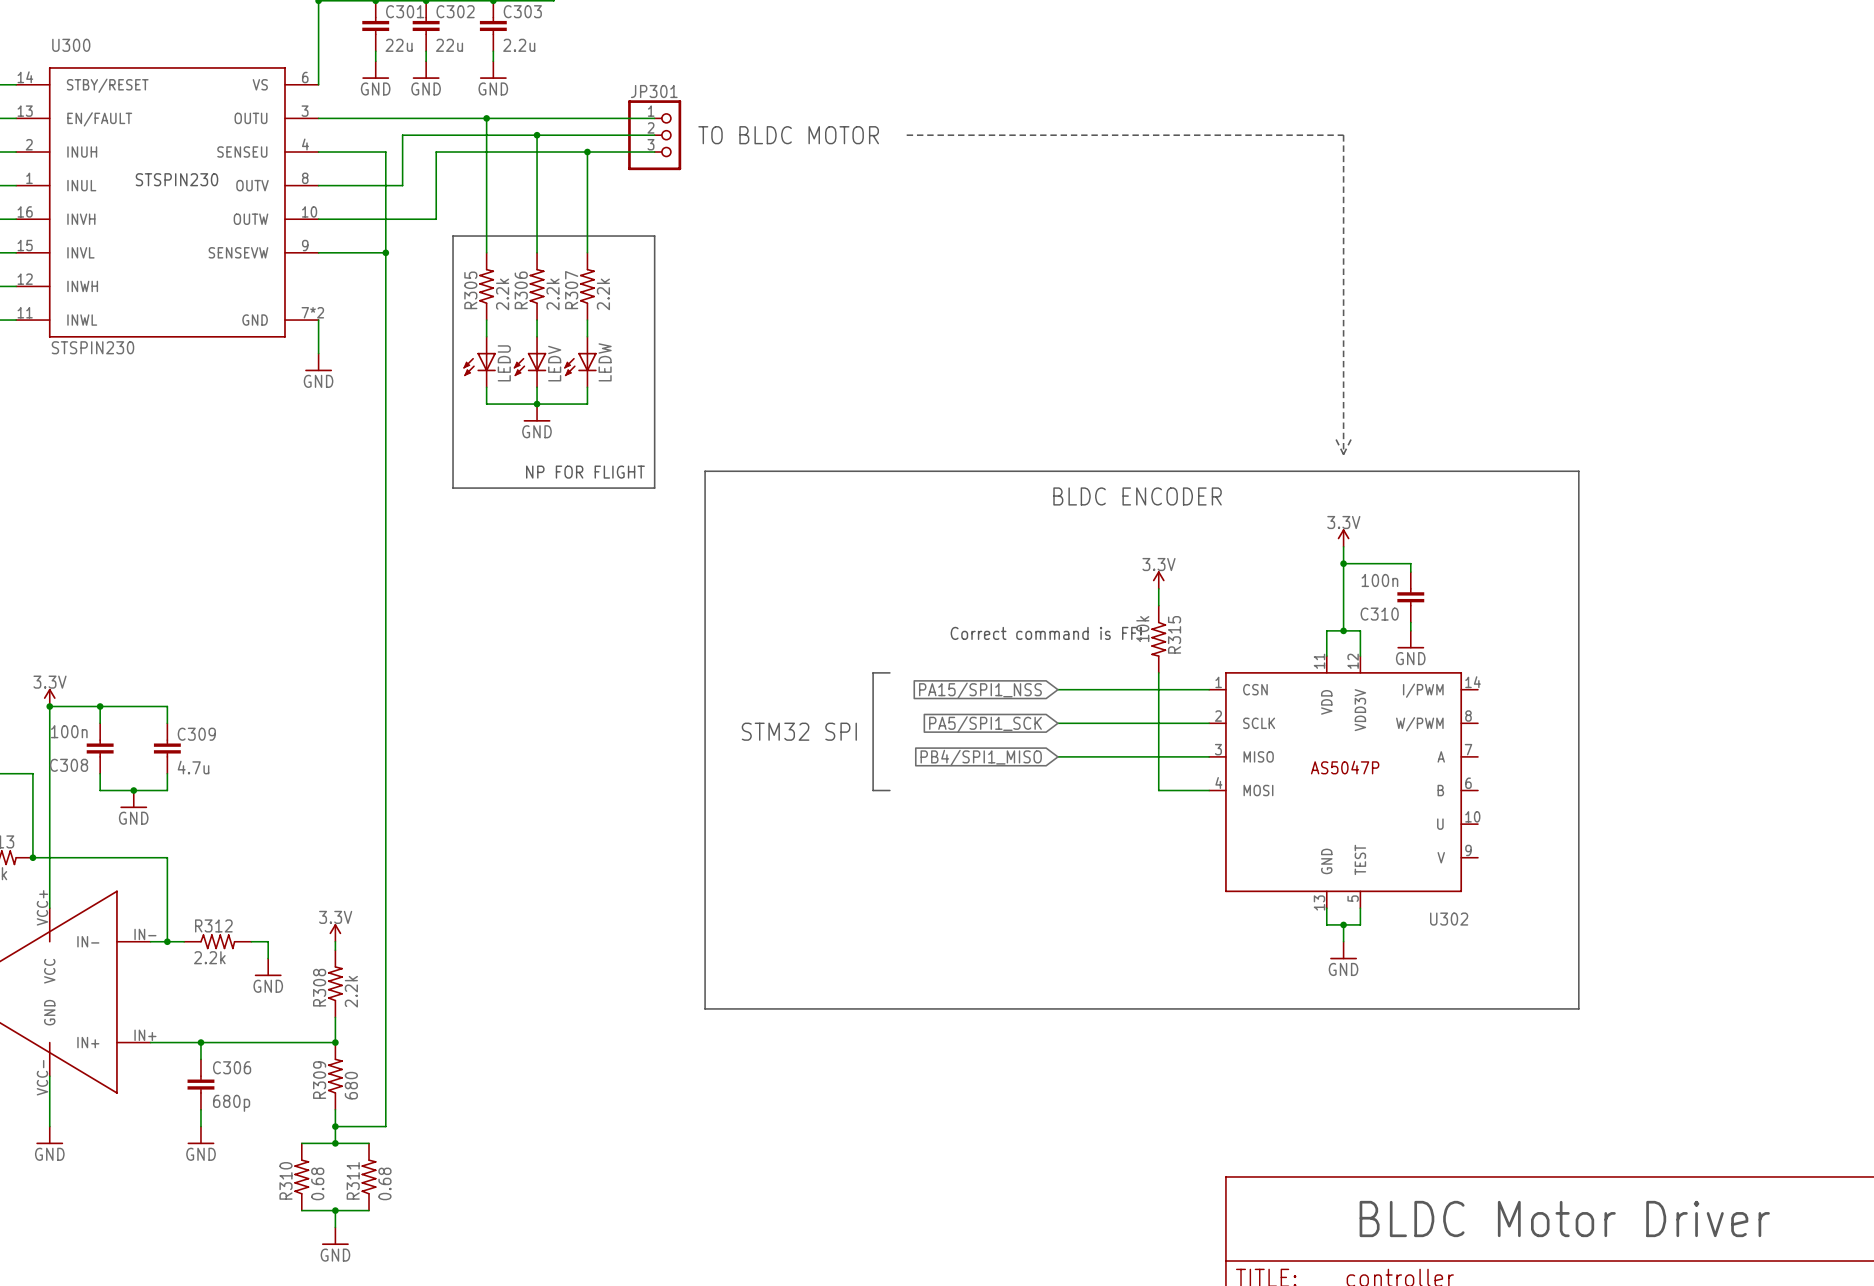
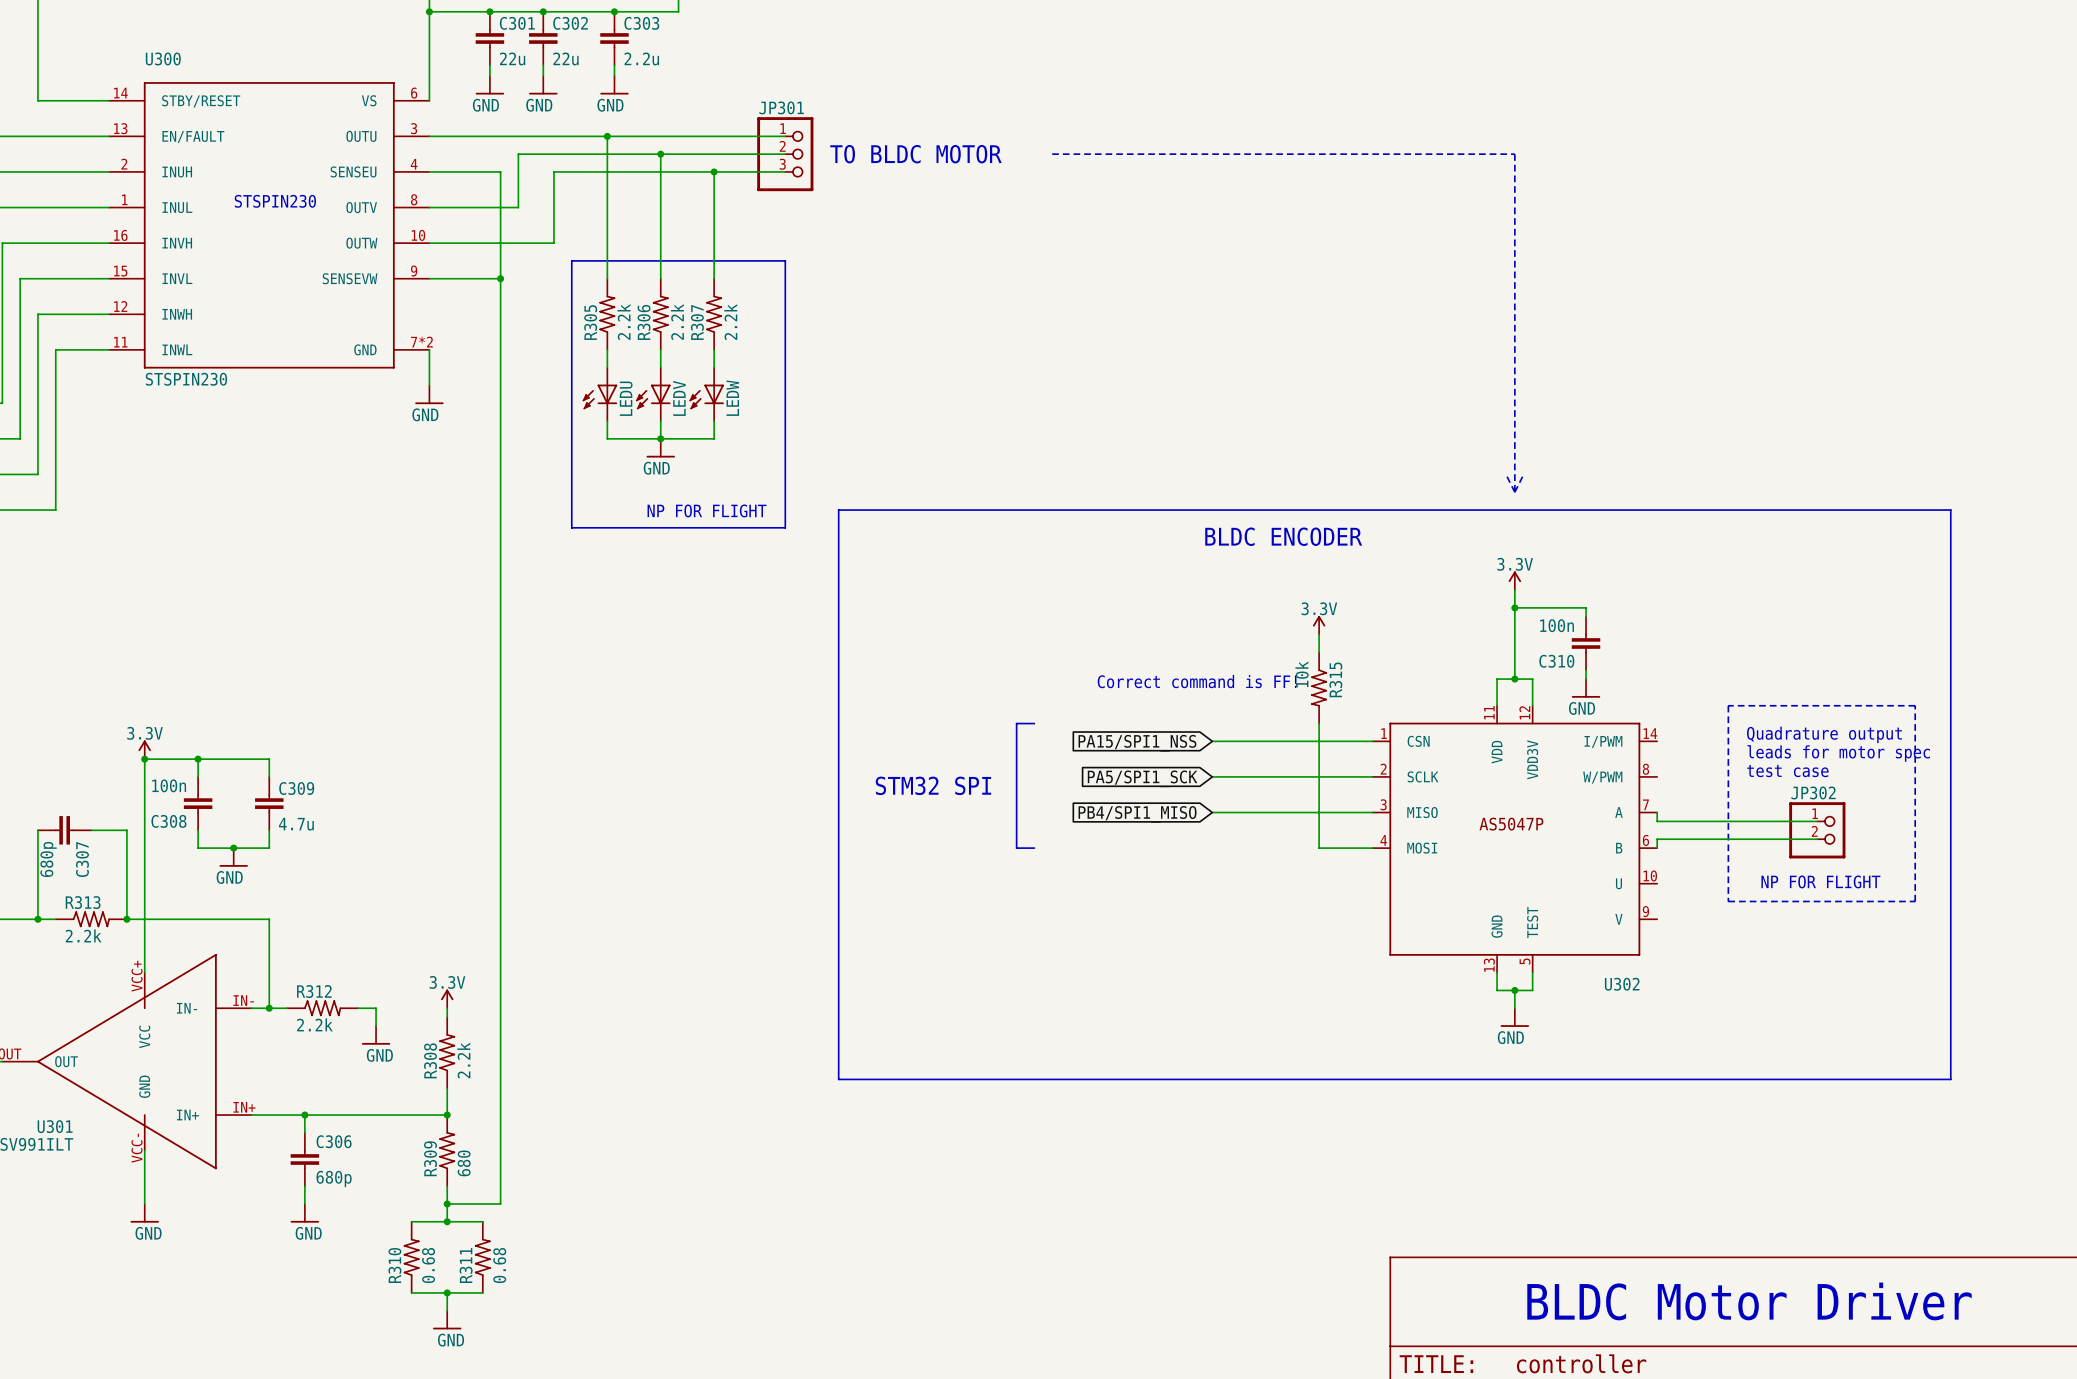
line: (1578, 471) (1578, 1008) -> (1763, 510) (1950, 510) (1950, 1079) (1763, 1079)
line: none -> (1728, 705) (1728, 901) (1915, 901) (1915, 705) (1728, 705)
text: none -> Quadrature output (1824, 734)
text: none -> leads for motor spec (1838, 753)
text: none -> test case (1787, 771)
wire: none -> (1657, 812) (1657, 821) (1817, 821)
JP302: none -> (1817, 830)
wire: none -> (1817, 839) (1657, 839) (1657, 848)
text: none -> NP FOR FLIGHT (1820, 881)

